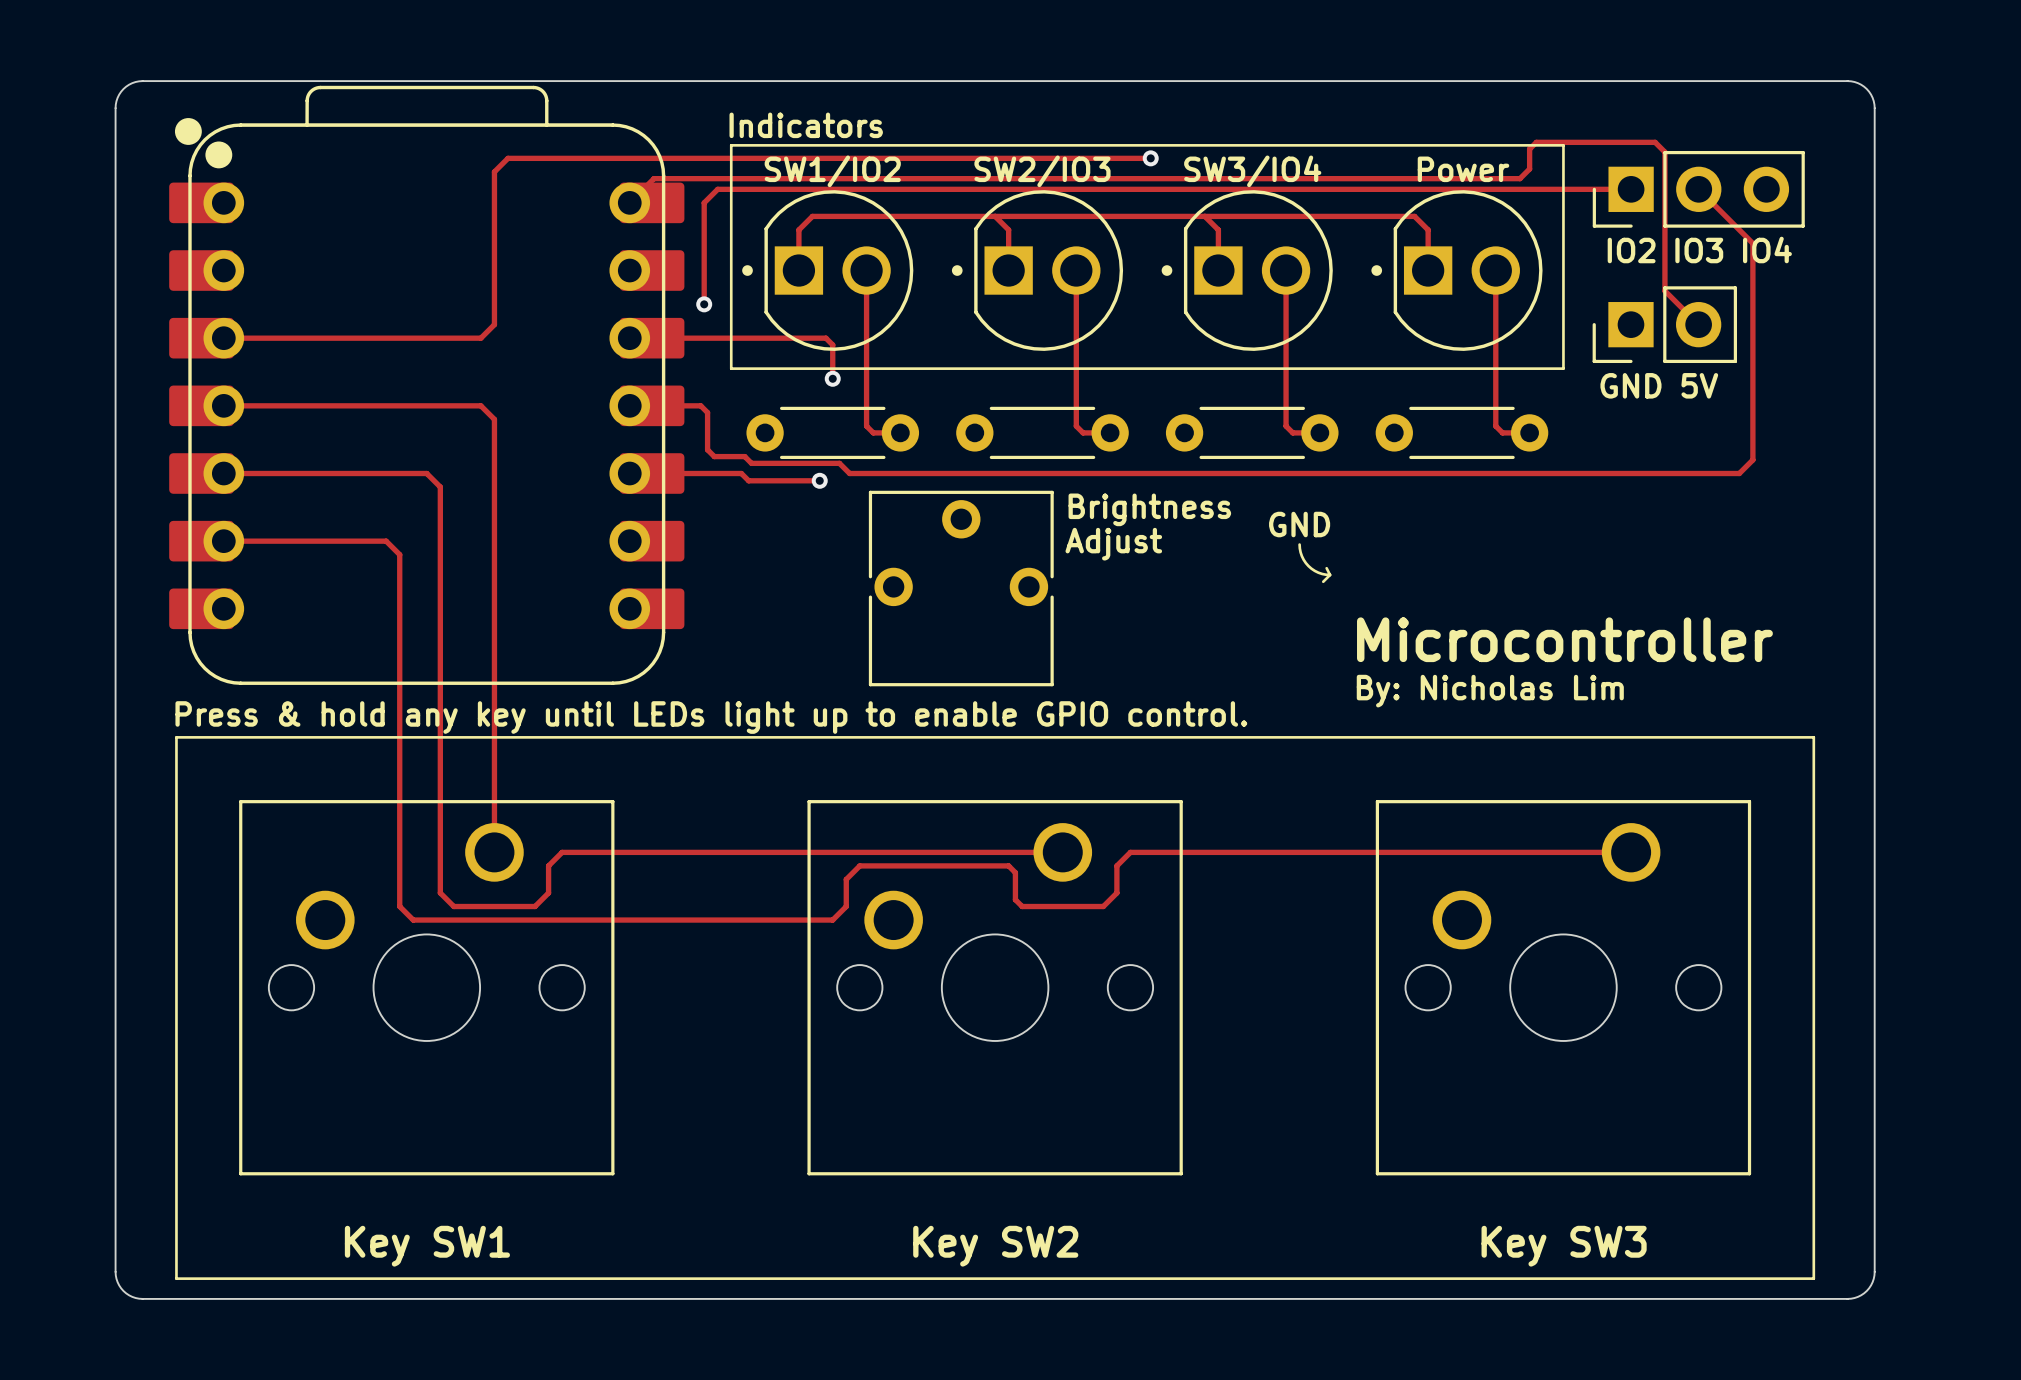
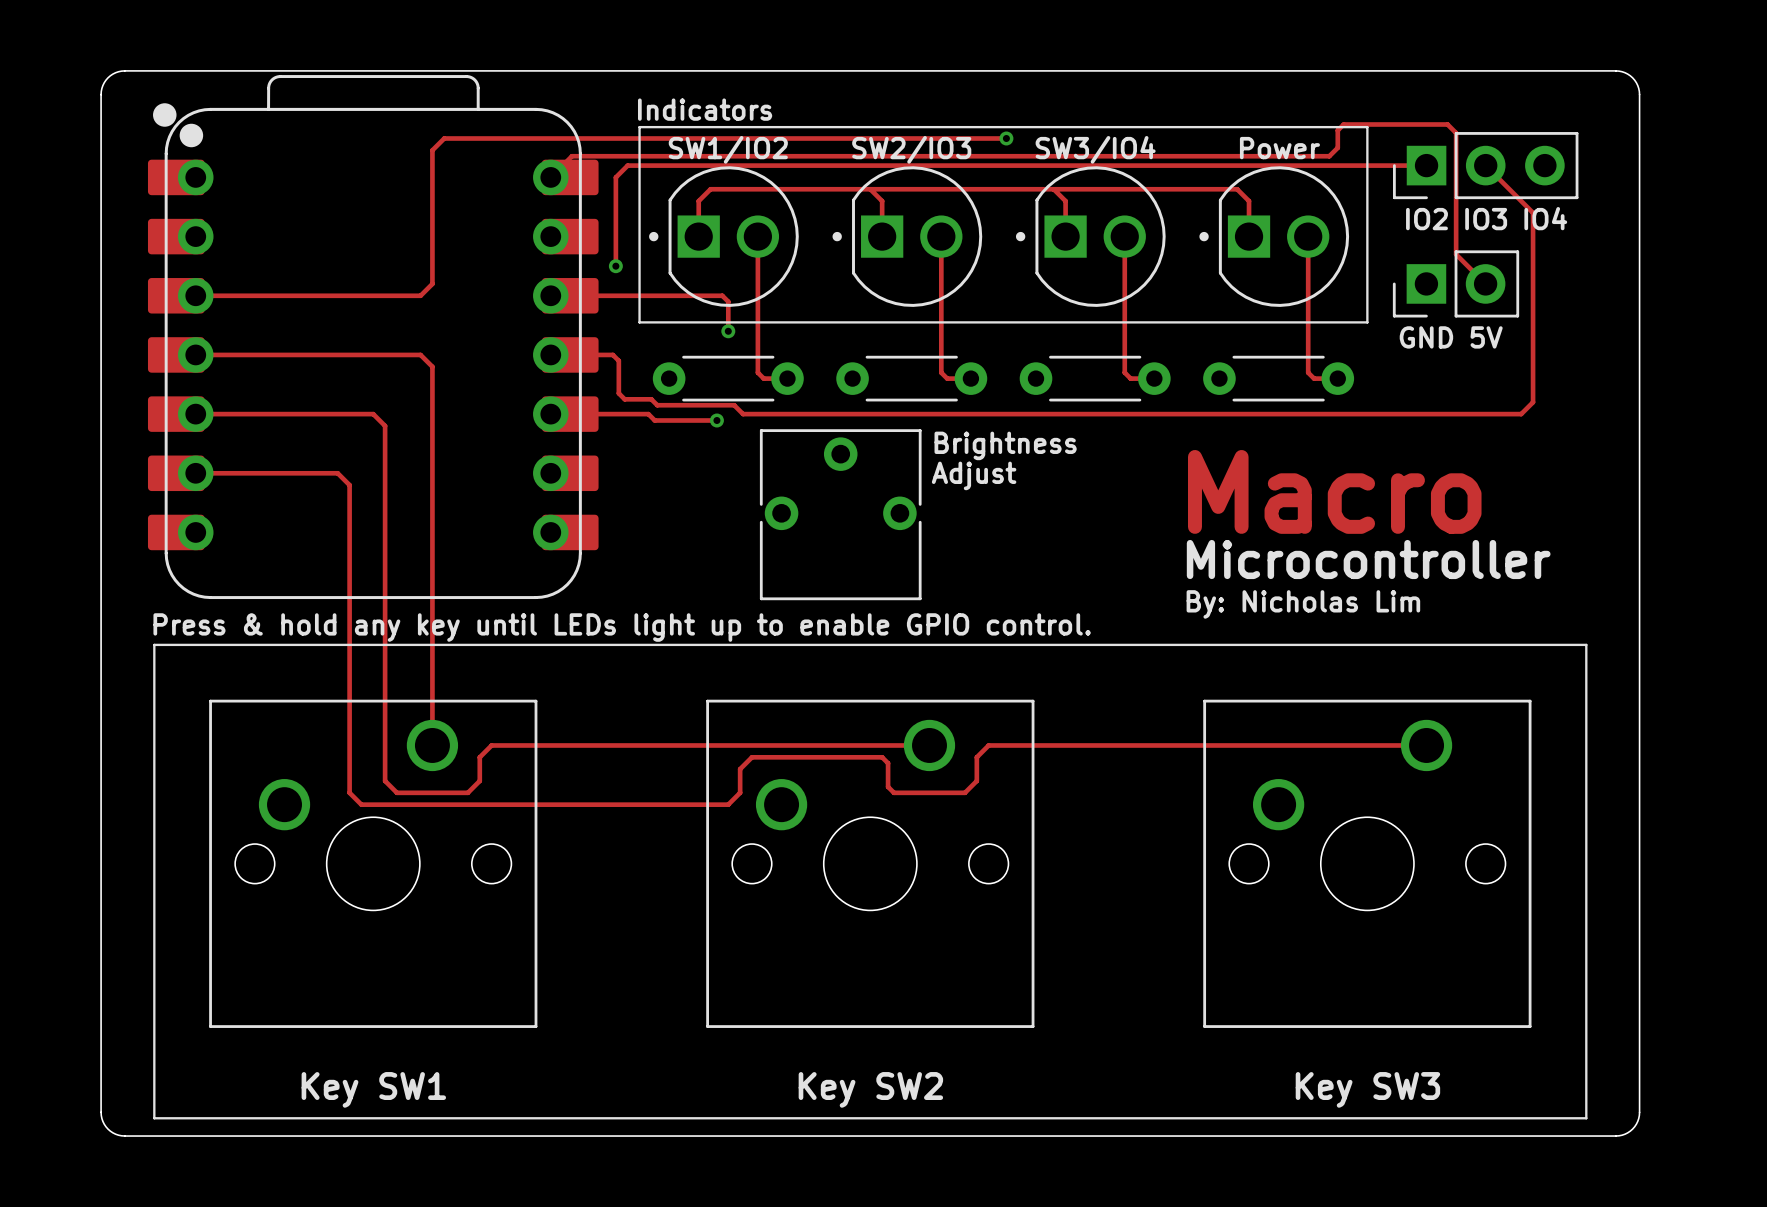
text: GND (1299, 524) -> none
line: (1299, 544) (1301, 556) (1308, 566) (1318, 572) (1330, 574) -> none
text: none -> Macro (1334, 491)
line: (1326, 568) (1330, 574) -> none
line: (1330, 574) (1323, 581) -> none

